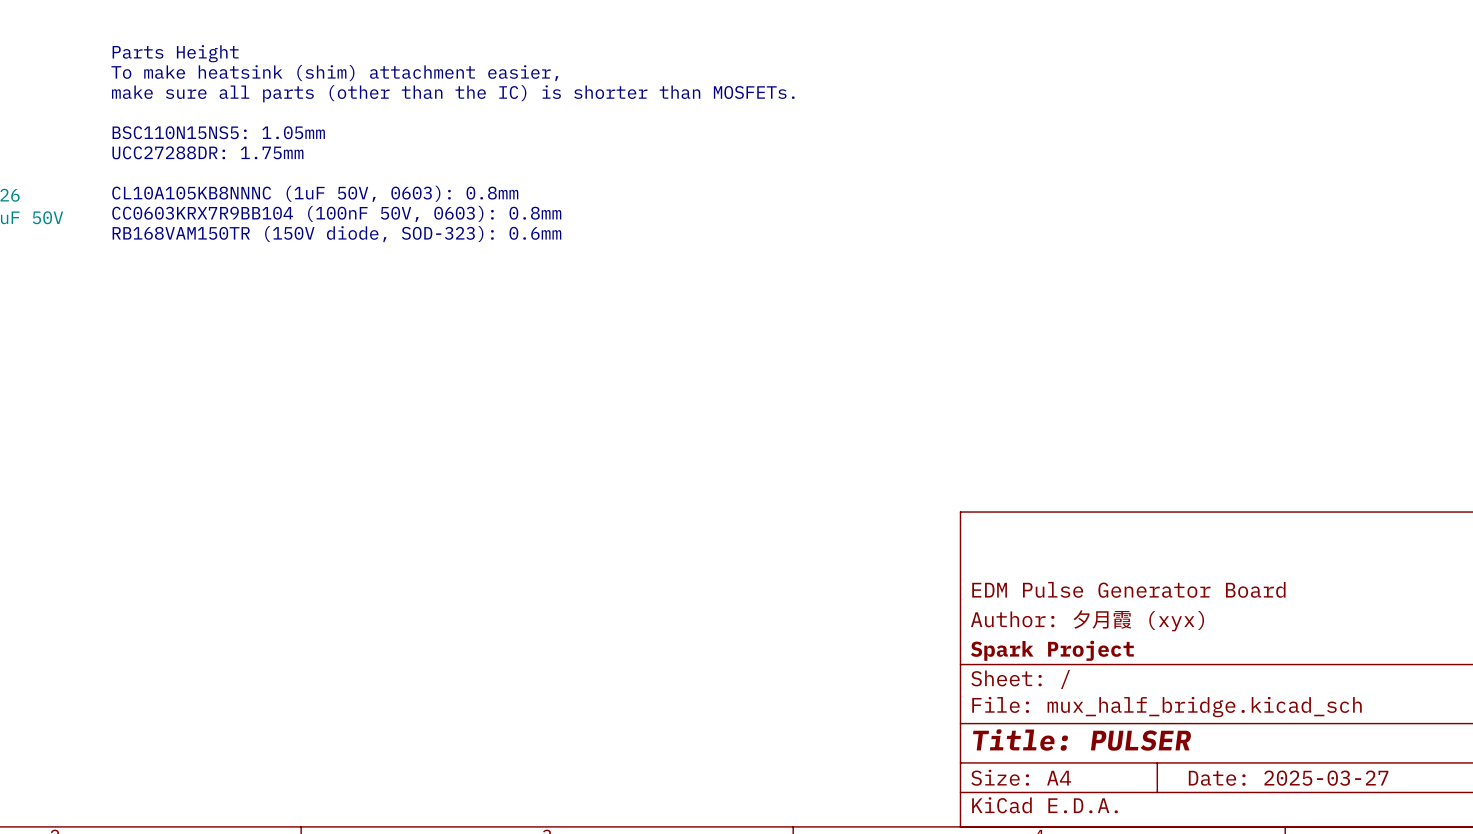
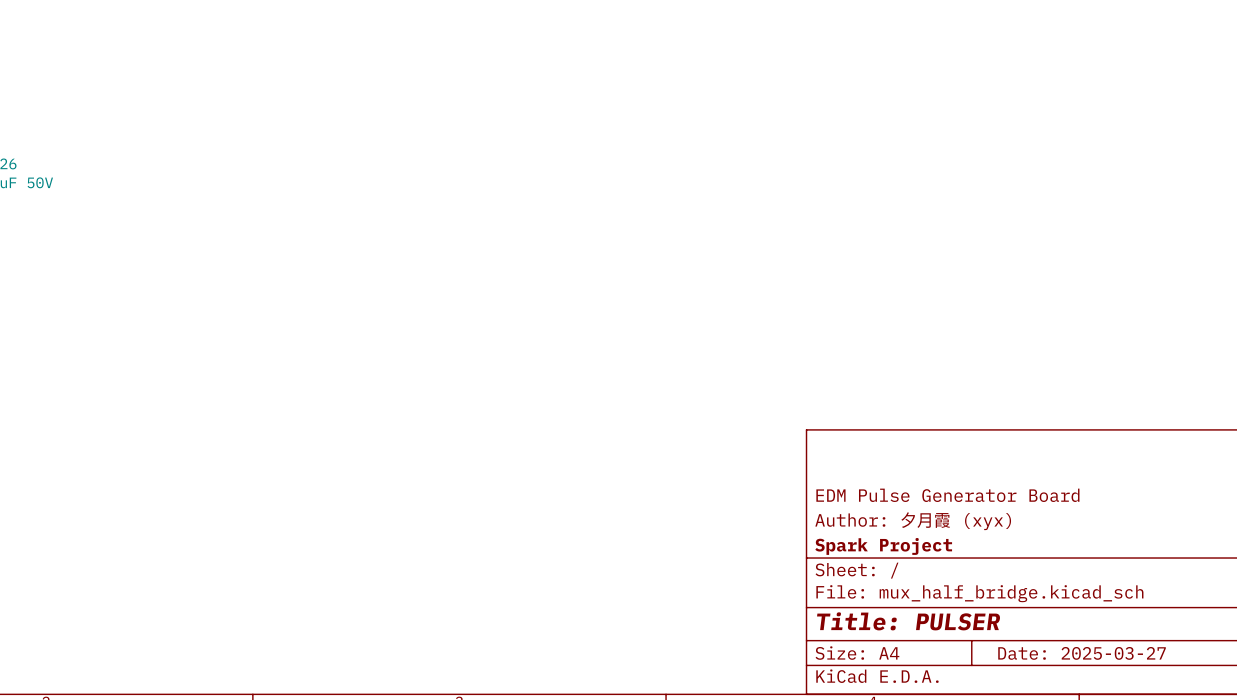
text: Parts Height (175, 53) -> none
text: To make heatsink (shim) attachment easier, (334, 73) -> none
text: make sure all parts (other than the IC) is shorter than MOSFETs. (453, 93) -> none
text: BSC110N15NS5: 1.05mm (218, 132) -> none
text: UCC27288DR: 1.75mm (207, 152) -> none
text: CL10A105KB8NNNC (1uF 50V, 0603): 0.8mm (315, 193) -> none
text: CC0603KRX7R9BB104 (100nF 50V, 0603): 0.8mm (336, 213) -> none
text: RB168VAM150TR (150V diode, SOD-323): 0.6mm (336, 234) -> none

